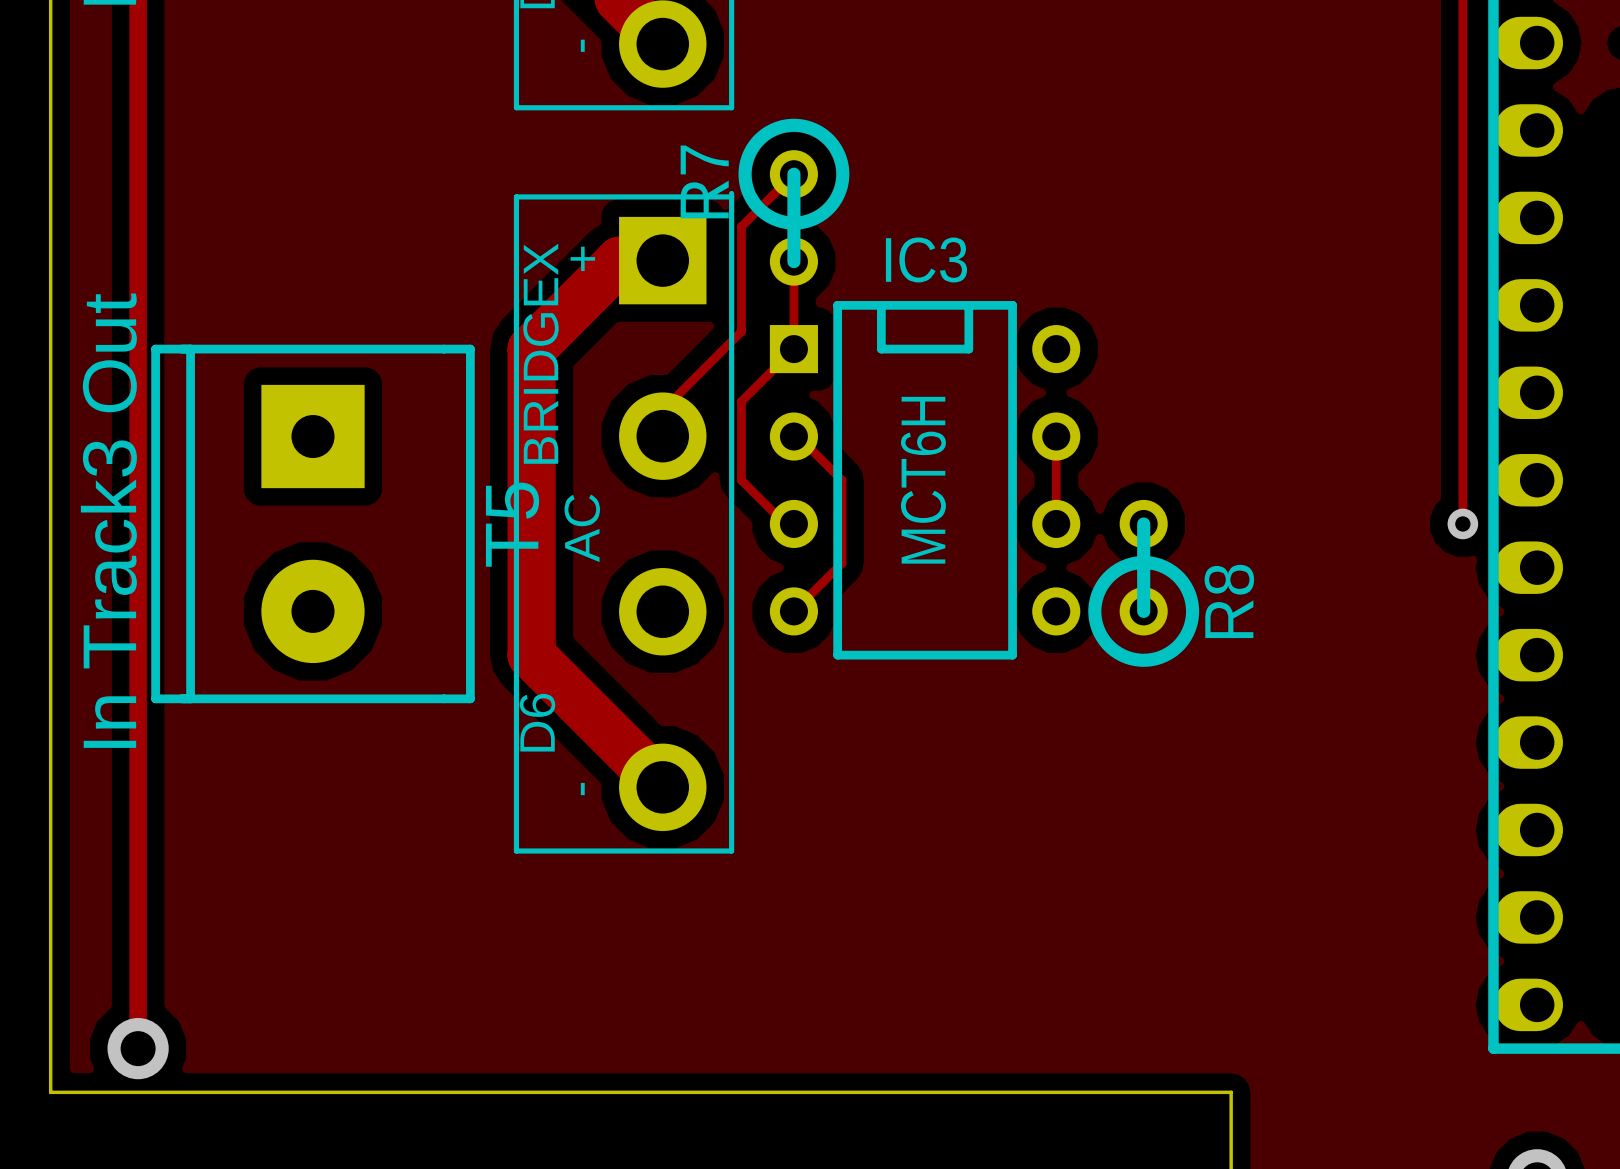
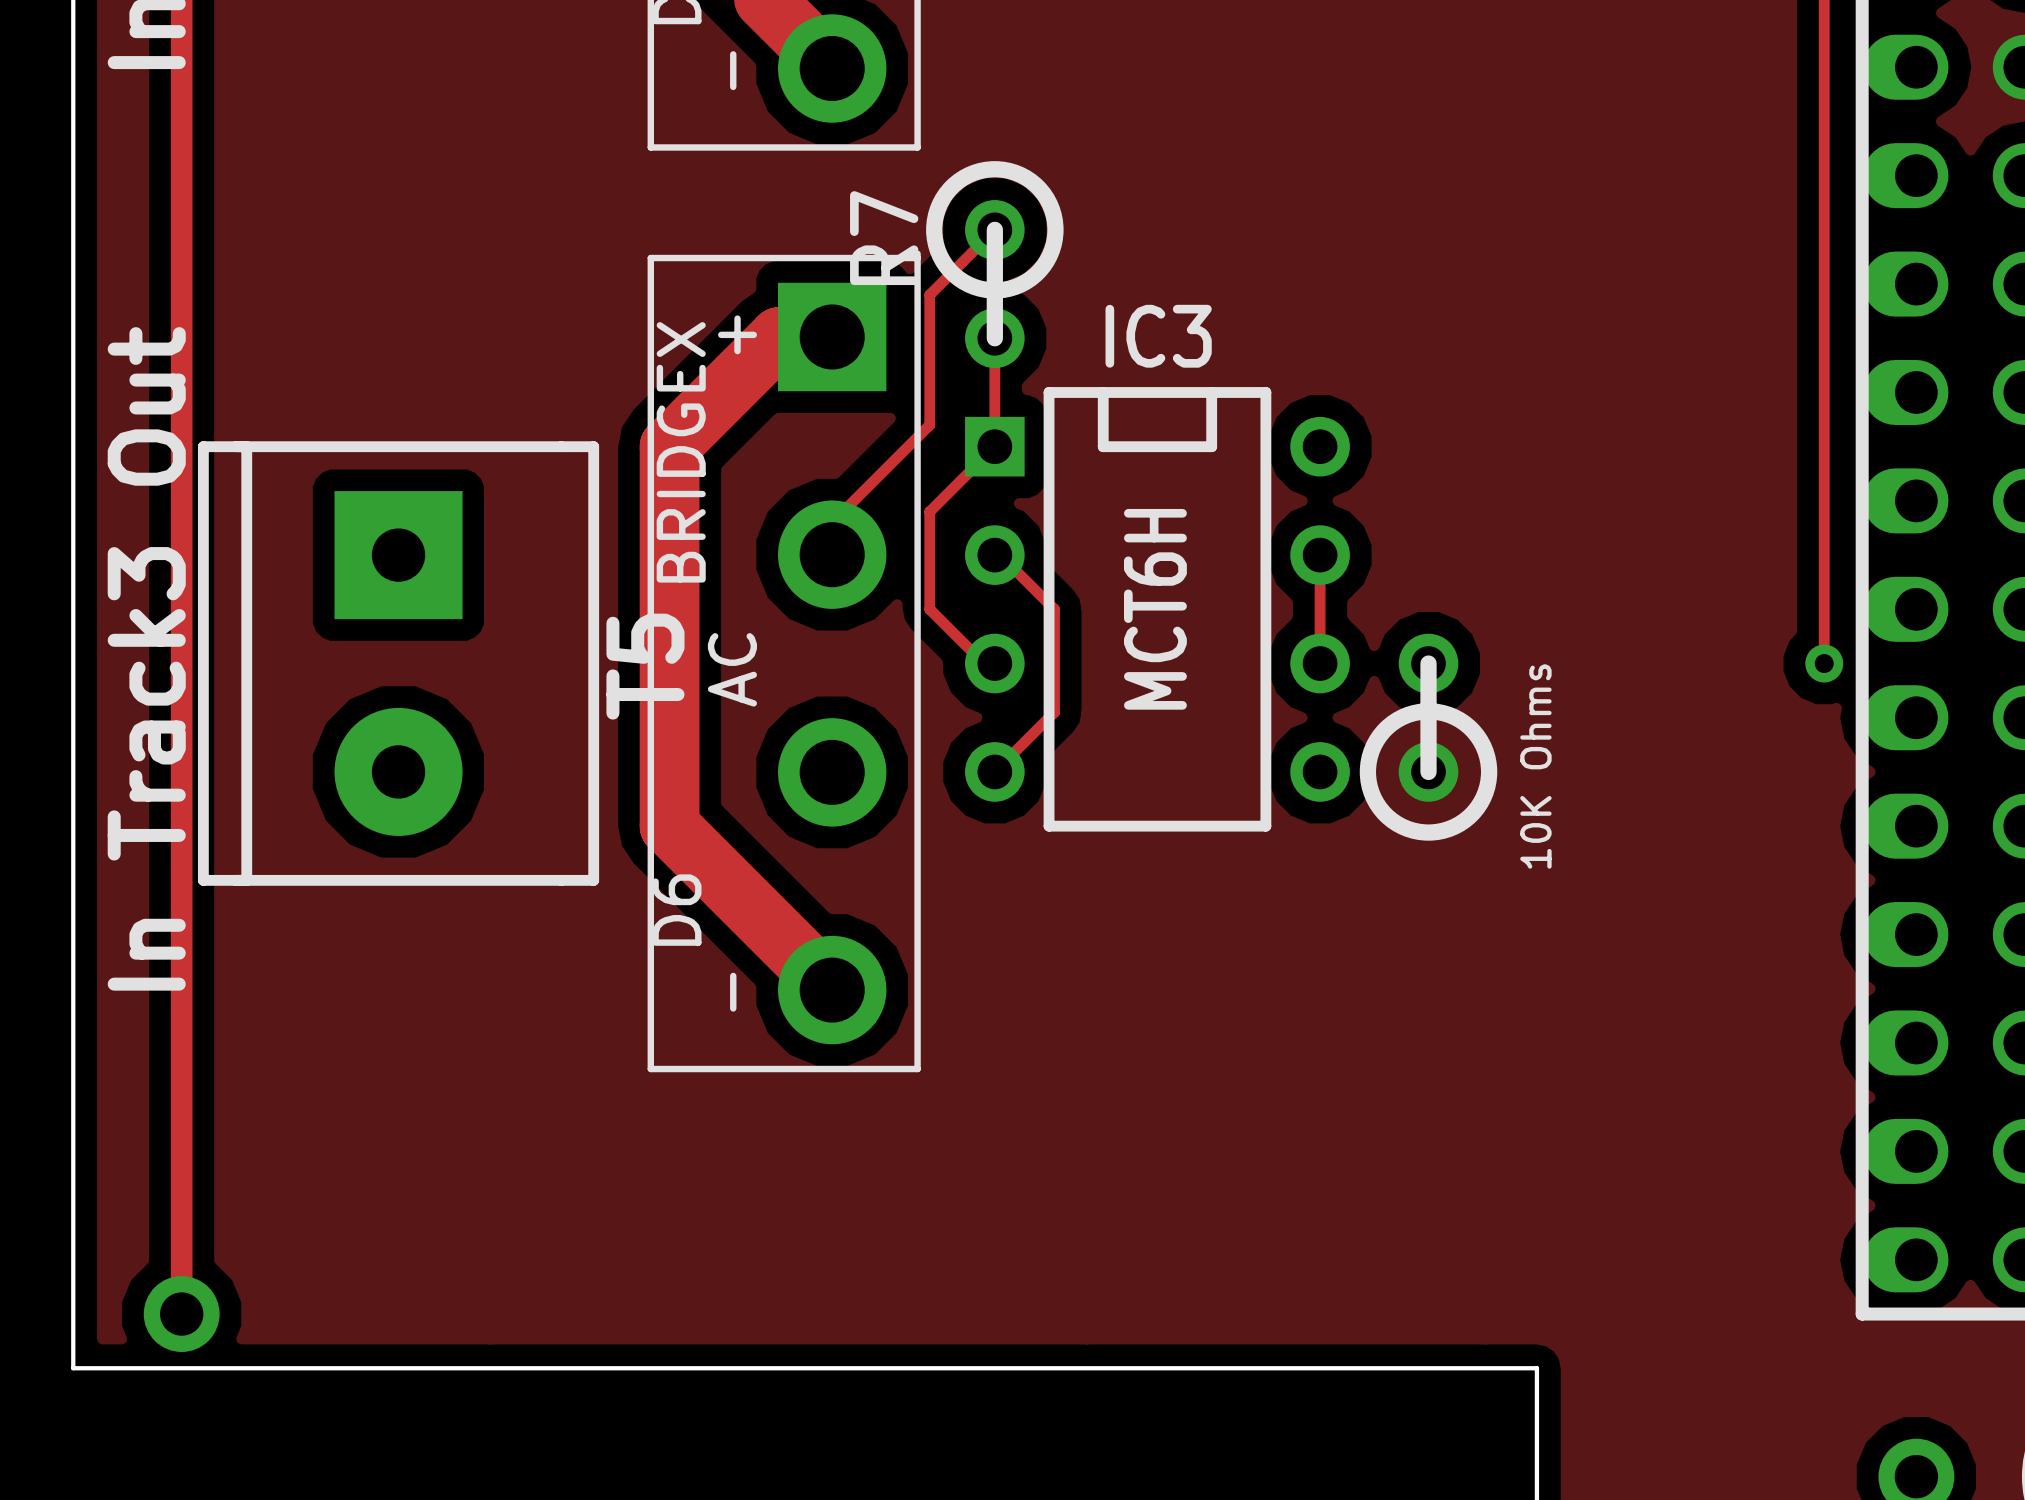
R8 name: R8 (1229, 601) -> none
R8 value: none -> 10K Ohms (1535, 766)

